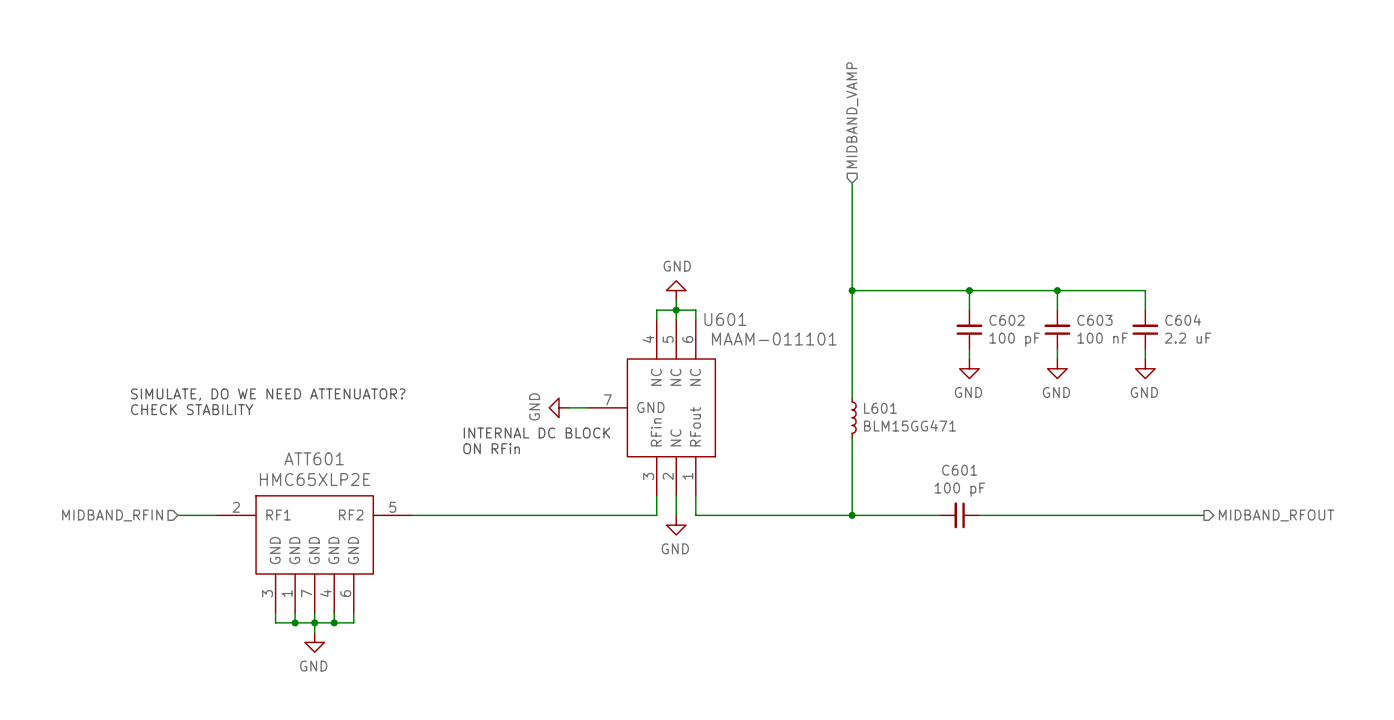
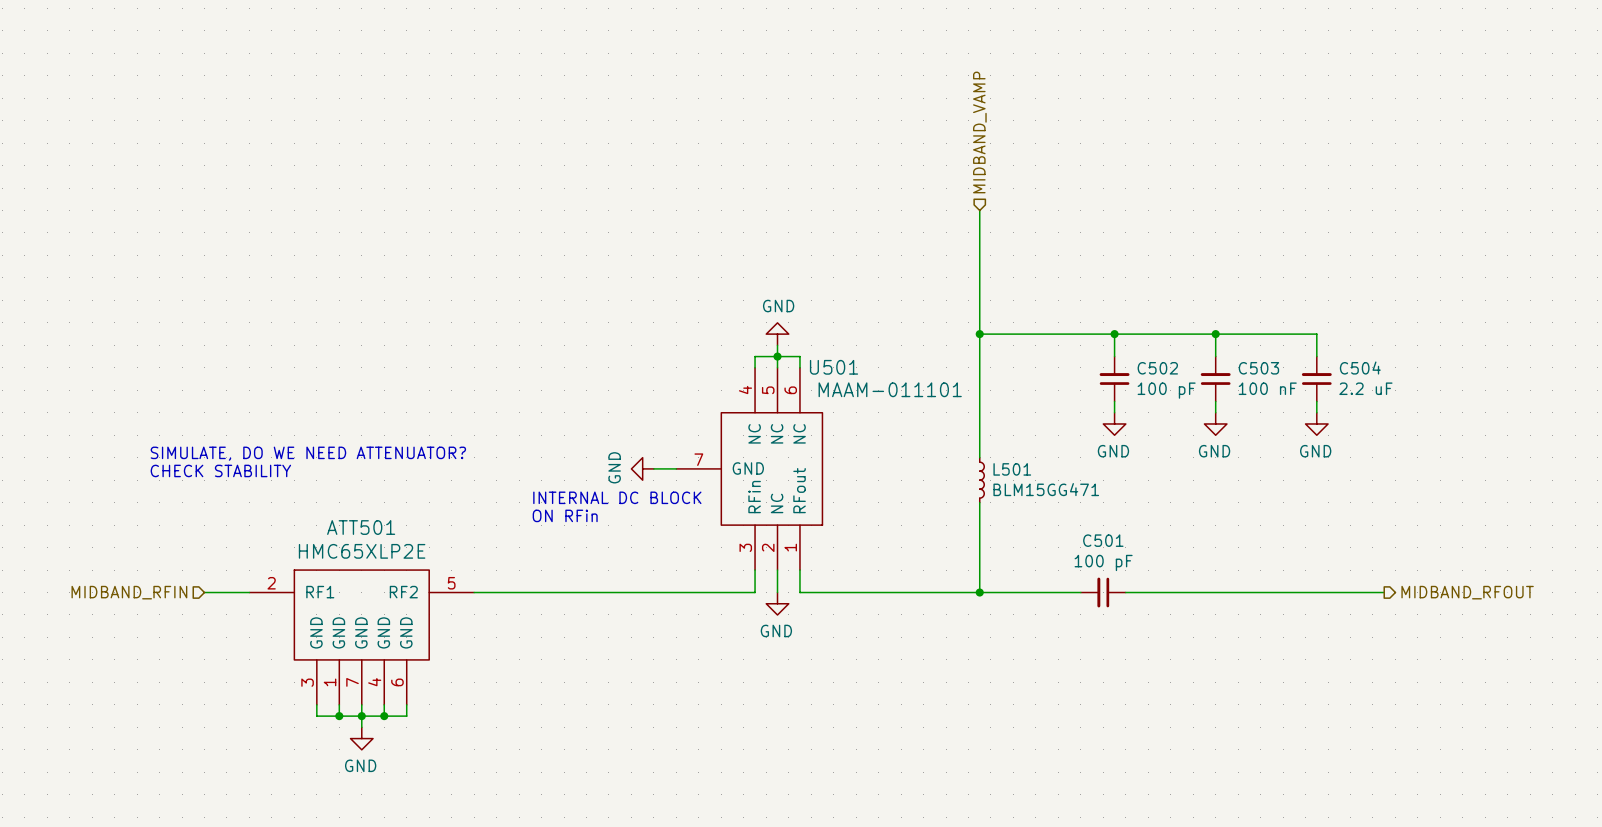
U601 name: U601 (725, 319) -> U501 (834, 367)
C602 name: C602 (1007, 320) -> C502 (1157, 368)
C603 name: C603 (1095, 320) -> C503 (1258, 368)
C604 name: C604 (1183, 320) -> C504 (1360, 368)
L601 name: L601 (880, 408) -> L501 (1012, 469)
ATT601 name: ATT601 (314, 458) -> ATT501 (361, 527)
C601 name: C601 (959, 470) -> C501 (1103, 540)

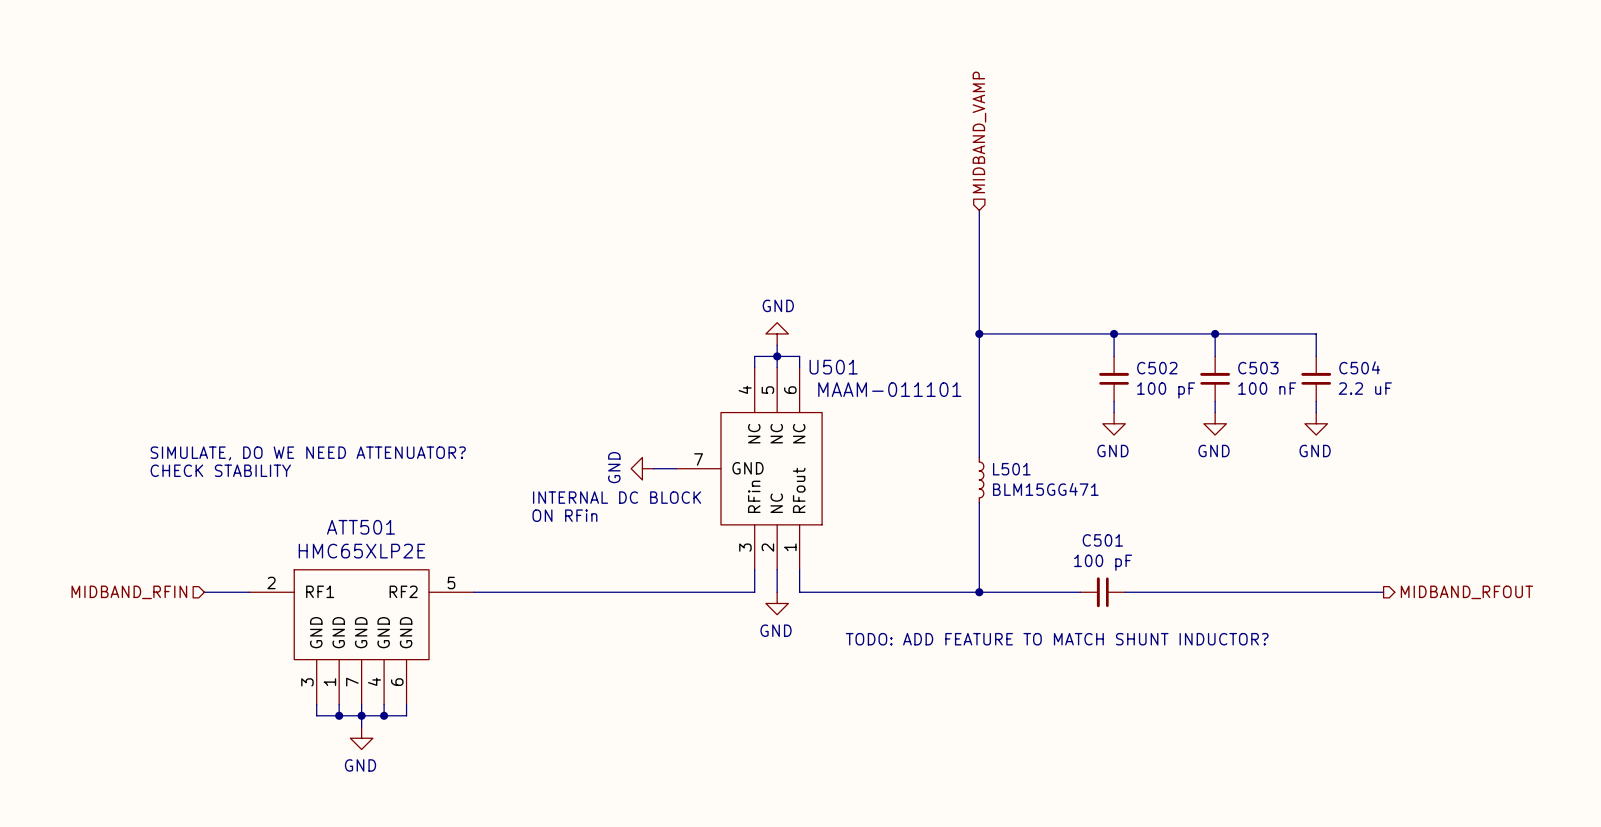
text: none -> TODO: ADD FEATURE TO MATCH SHUNT INDUCTOR? (1057, 639)

